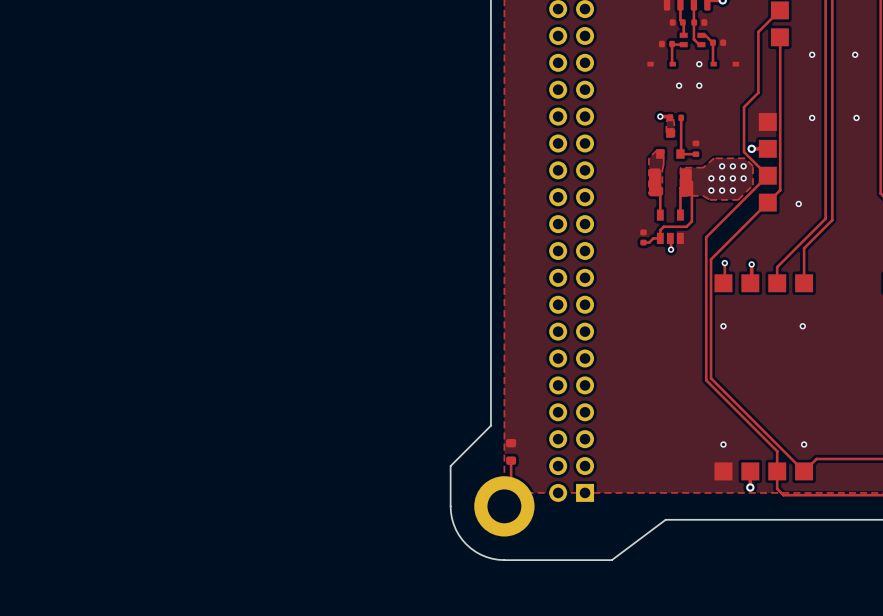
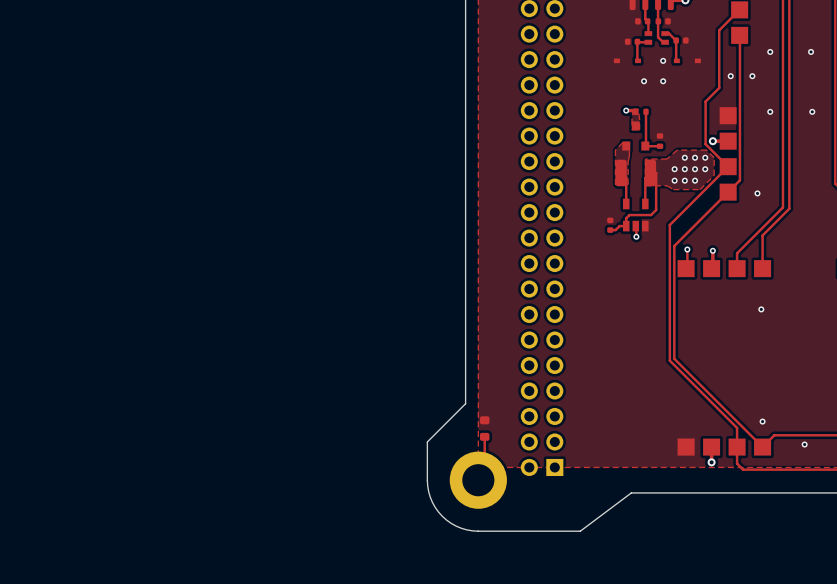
via: none -> (730, 76)
via: none -> (752, 76)
via: (723, 326) -> none
via: (723, 444) -> none
via: none -> (804, 444)

